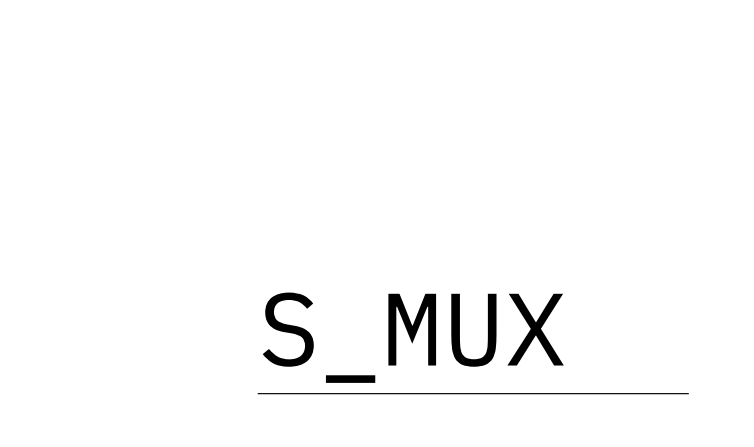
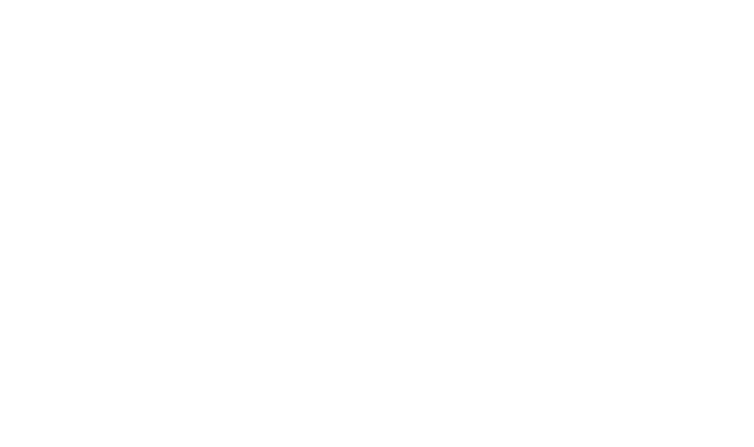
label: S_MUX (413, 337) -> none
wire: (258, 393) (688, 393) -> none

